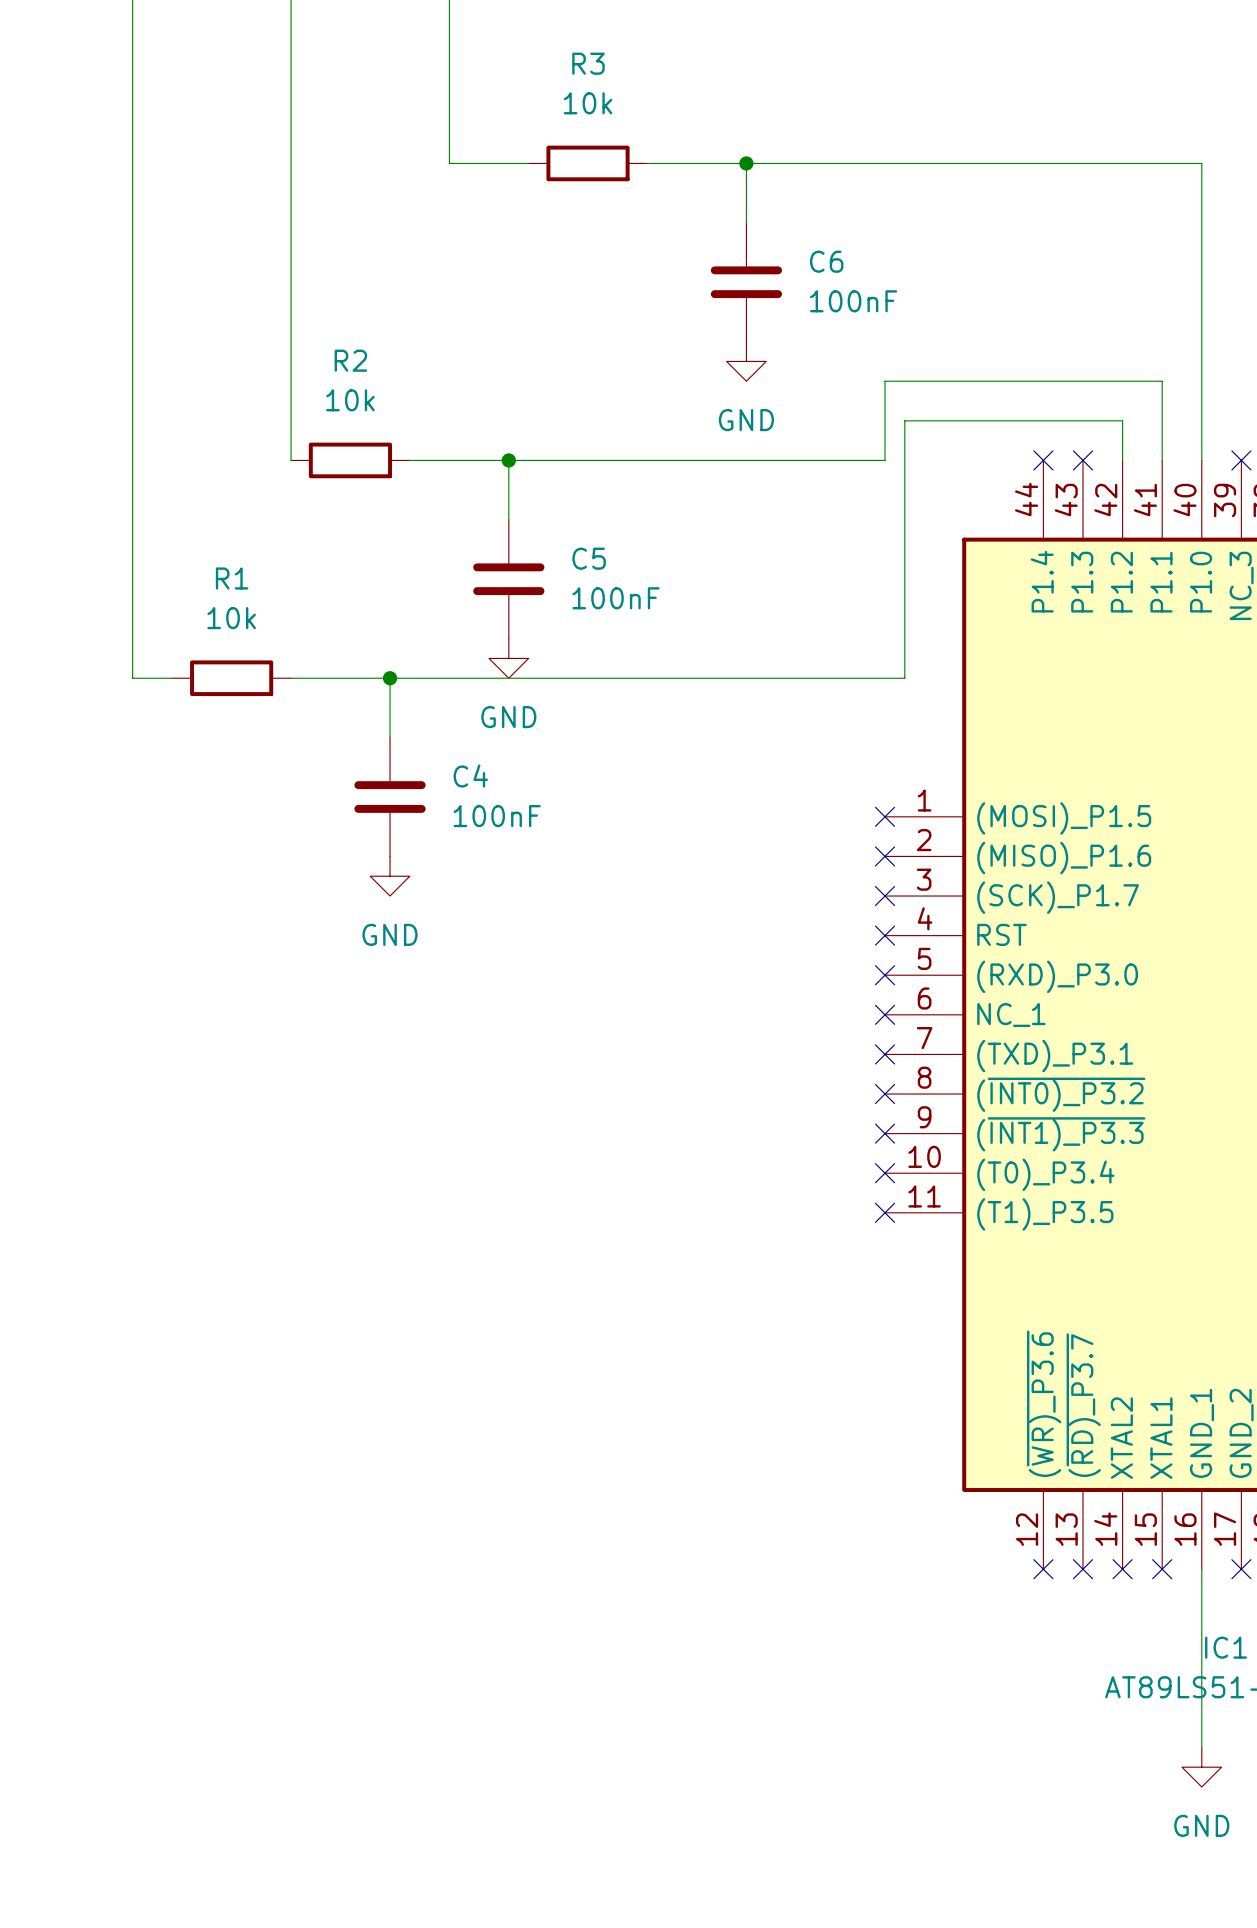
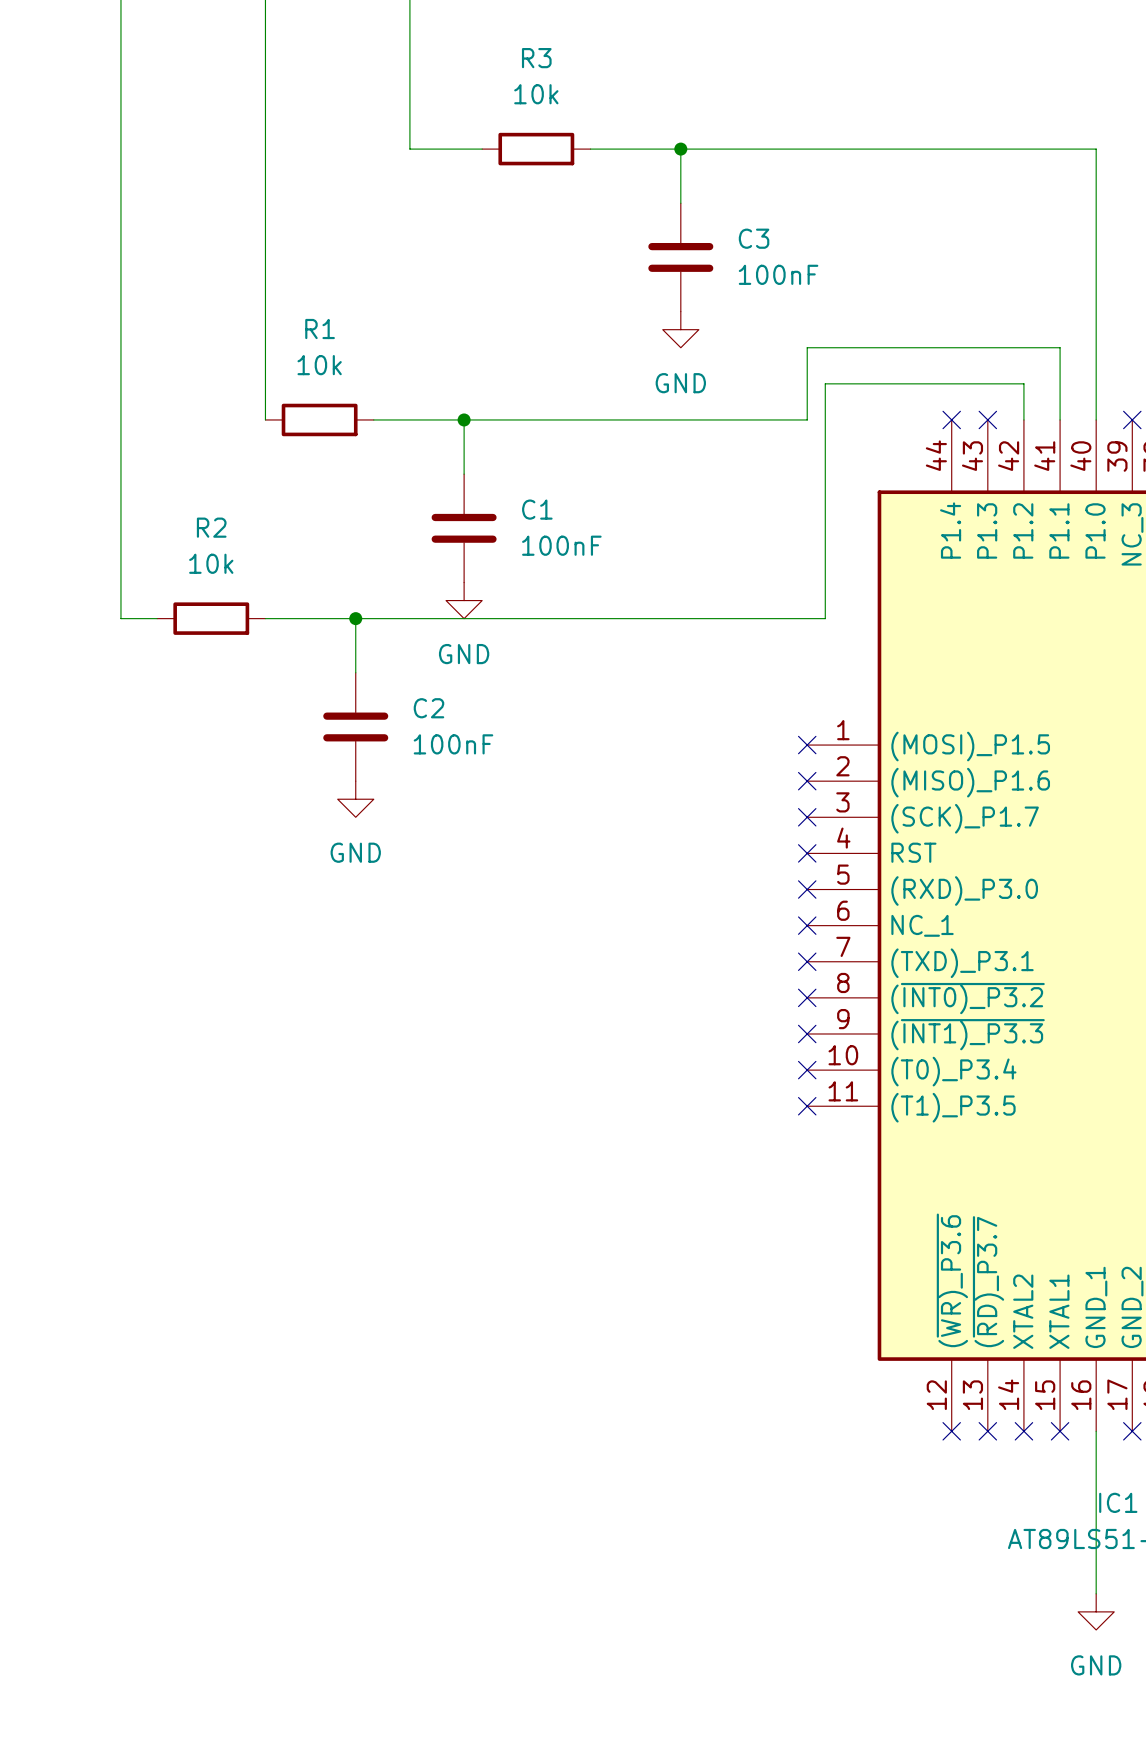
C6 name: C6 (826, 261) -> C3 (754, 238)
R2 name: R2 (350, 360) -> R1 (320, 329)
C5 name: C5 (589, 558) -> C1 (537, 509)
R1 name: R1 (232, 578) -> R2 (211, 527)
C4 name: C4 (470, 776) -> C2 (428, 708)

